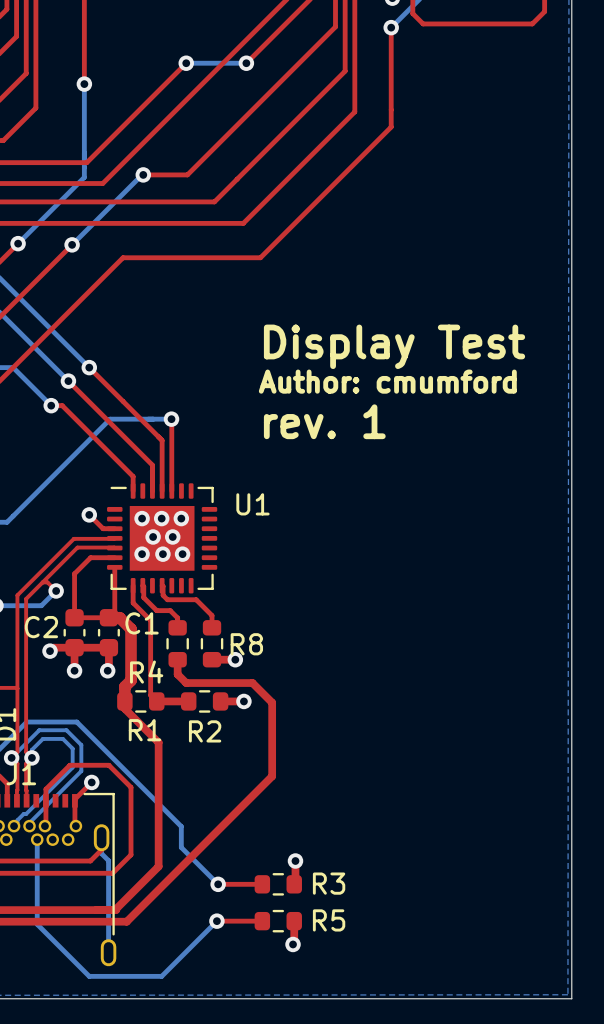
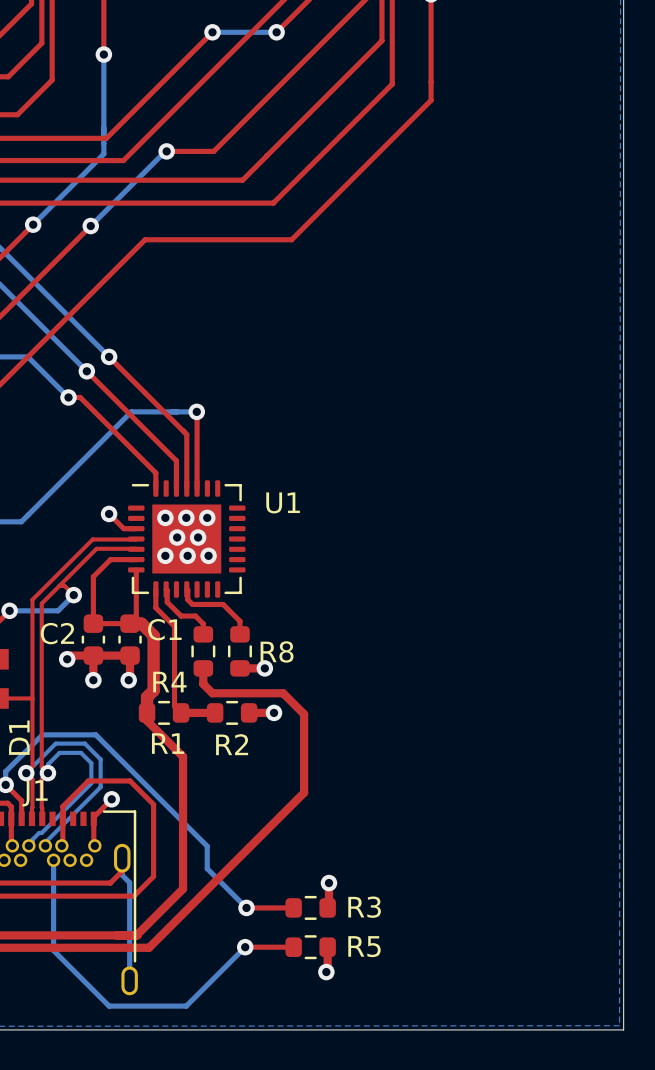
text: Display Test (394, 346) -> none
text: Author: cmumford (387, 381) -> none
text: rev. 1 (324, 421) -> none

